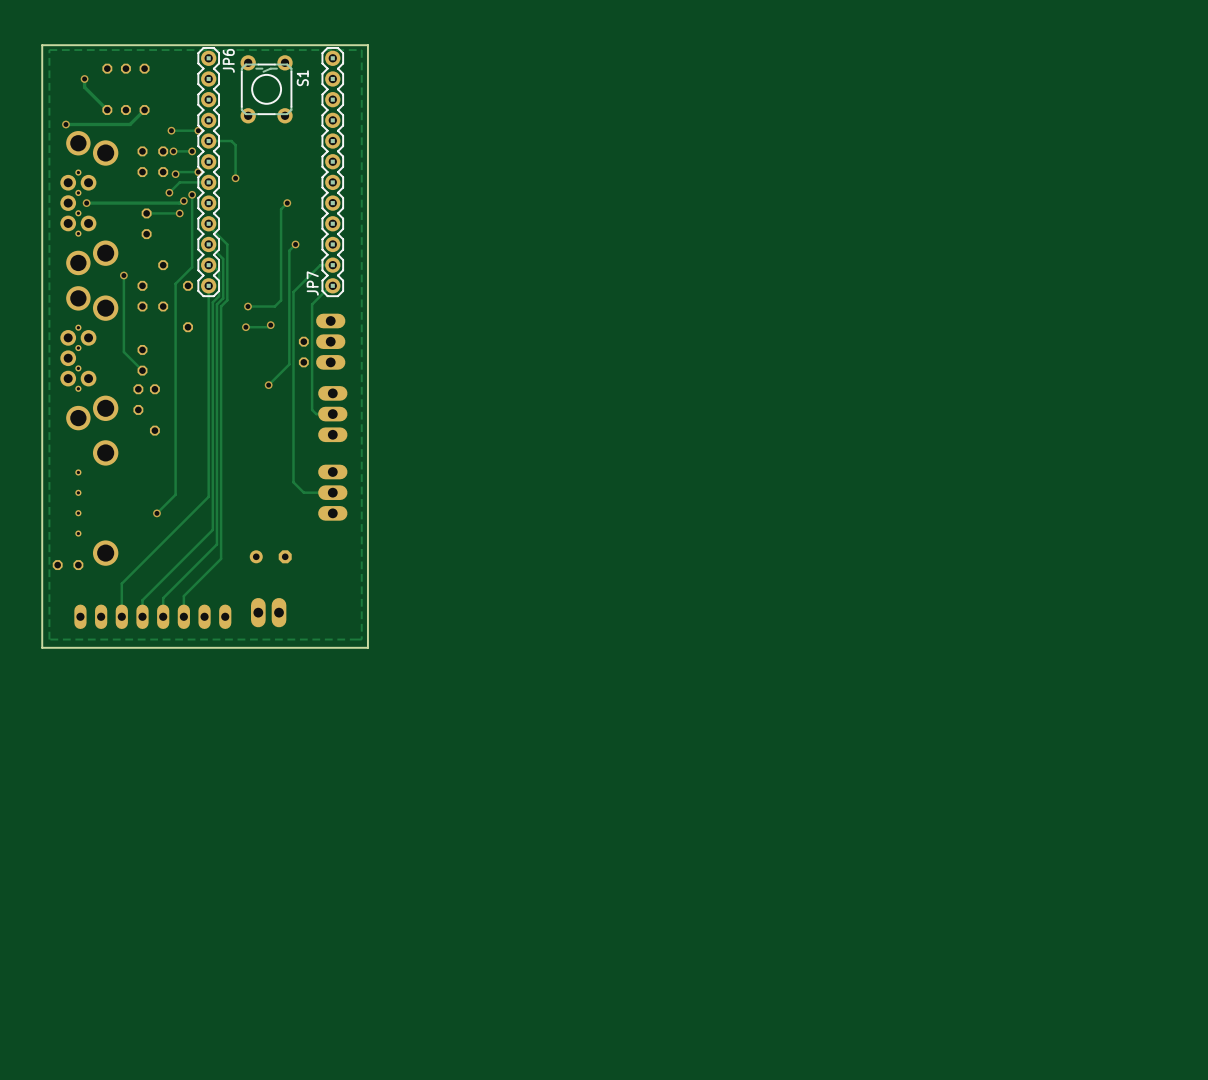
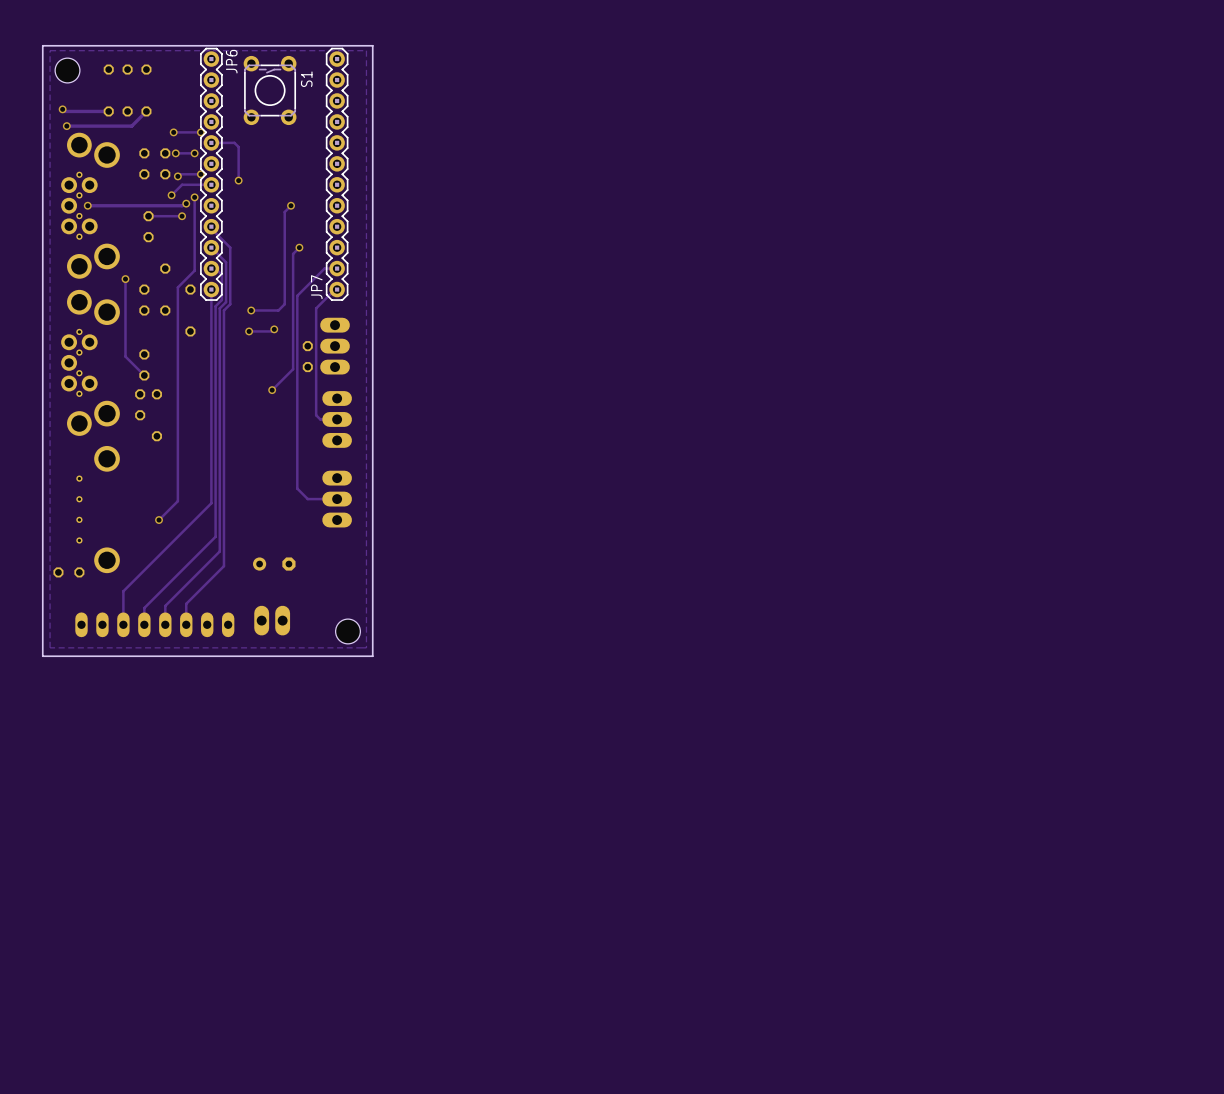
part: none -> (67, 70)
track: (84, 78) (84, 87) (107, 110) -> (62, 109) (64, 111) (108, 111)
via position: (84, 78) -> (62, 109)
part: none -> (347, 631)

